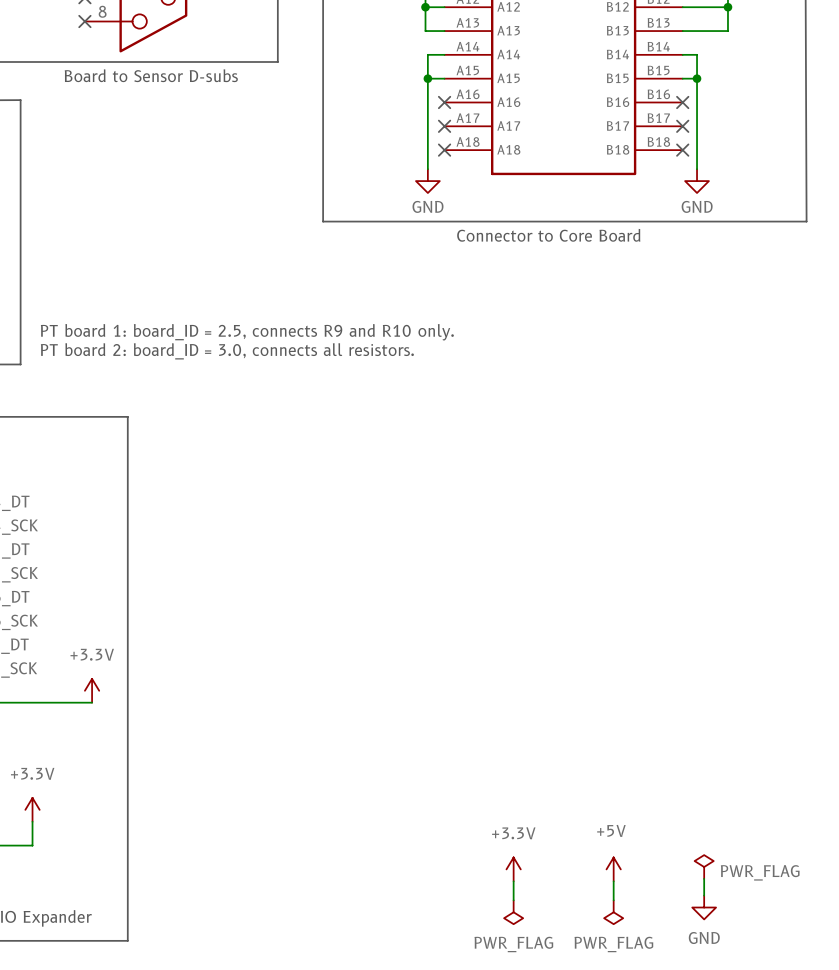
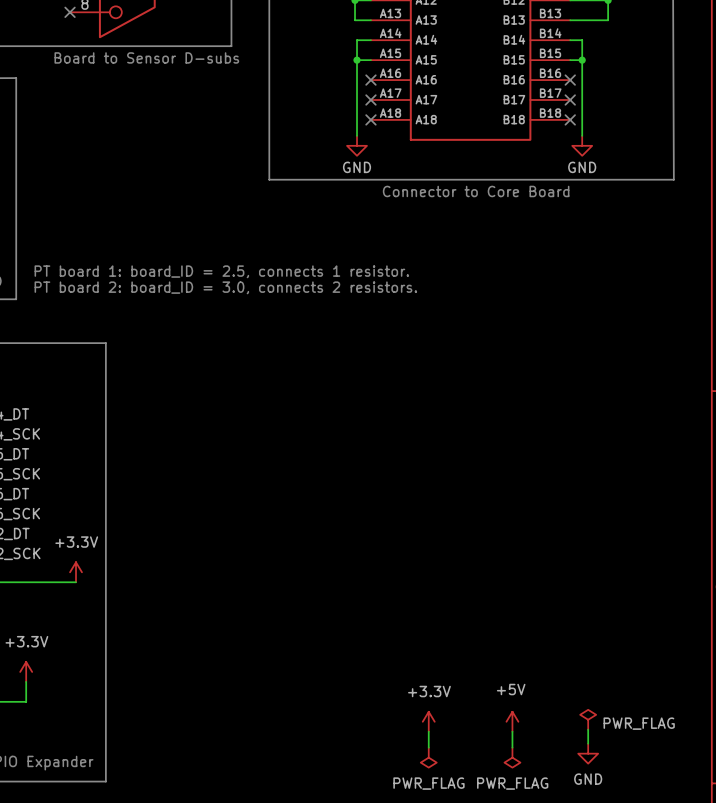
text: PT board 1: board_ID = 2.5, connects R9 and R10 only. (247, 332) -> PT board 1: board_ID = 2.5, connects 1 resistor. (221, 271)
text: PT board 2: board_ID = 3.0, connects all resistors. (227, 351) -> PT board 2: board_ID = 3.0, connects 2 resistors. (225, 287)

